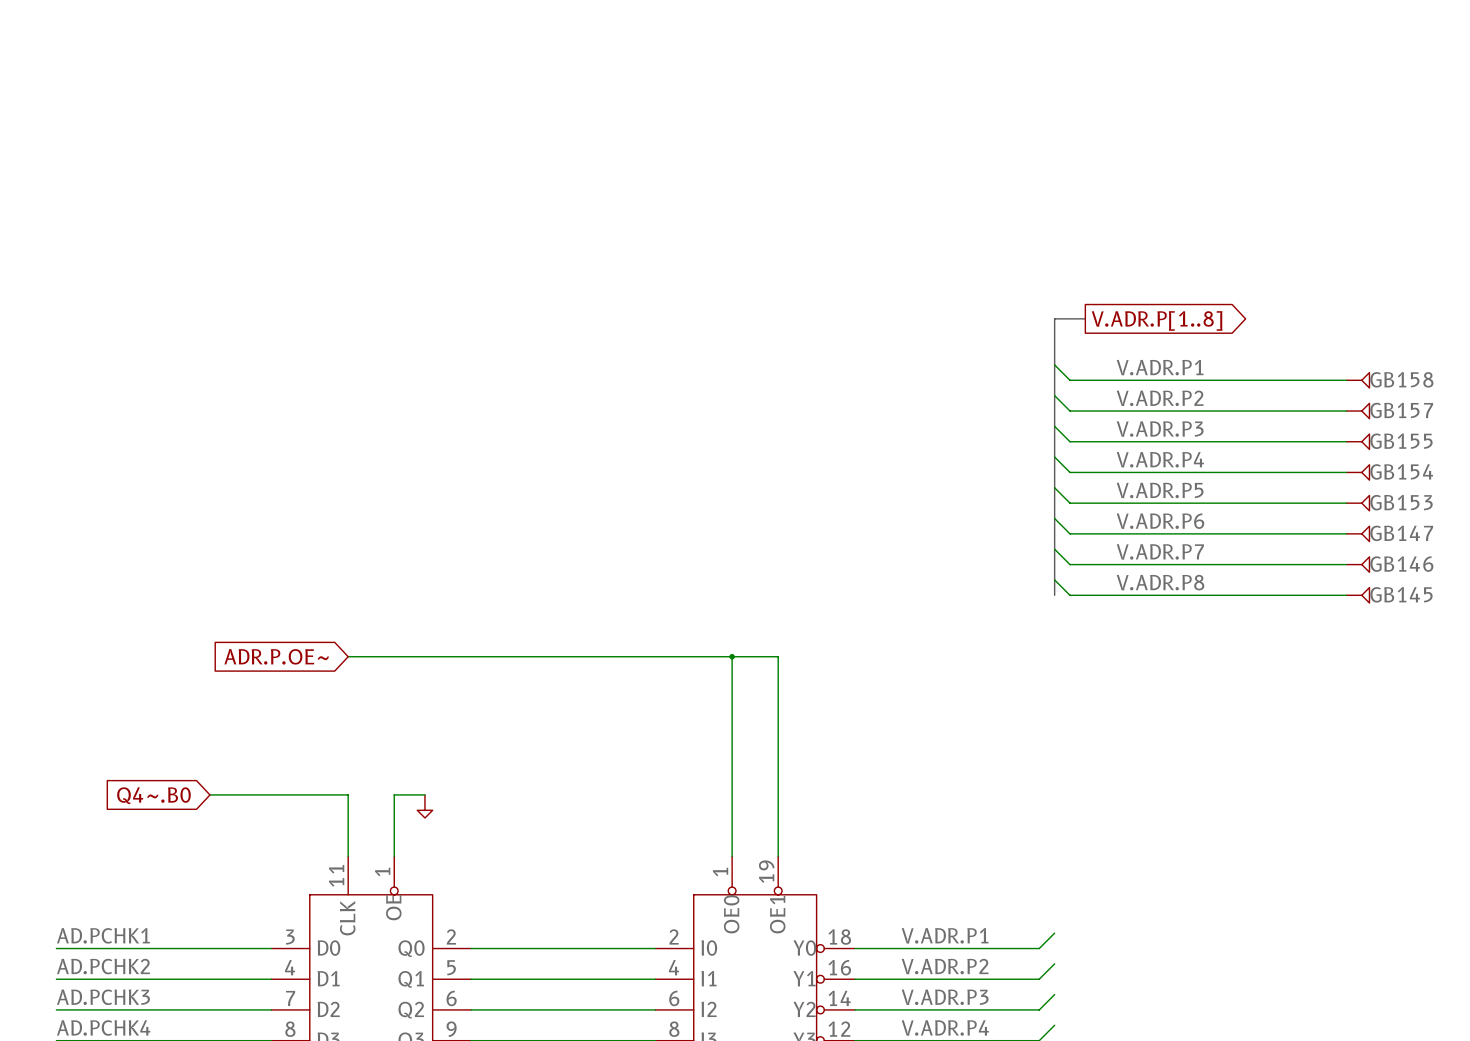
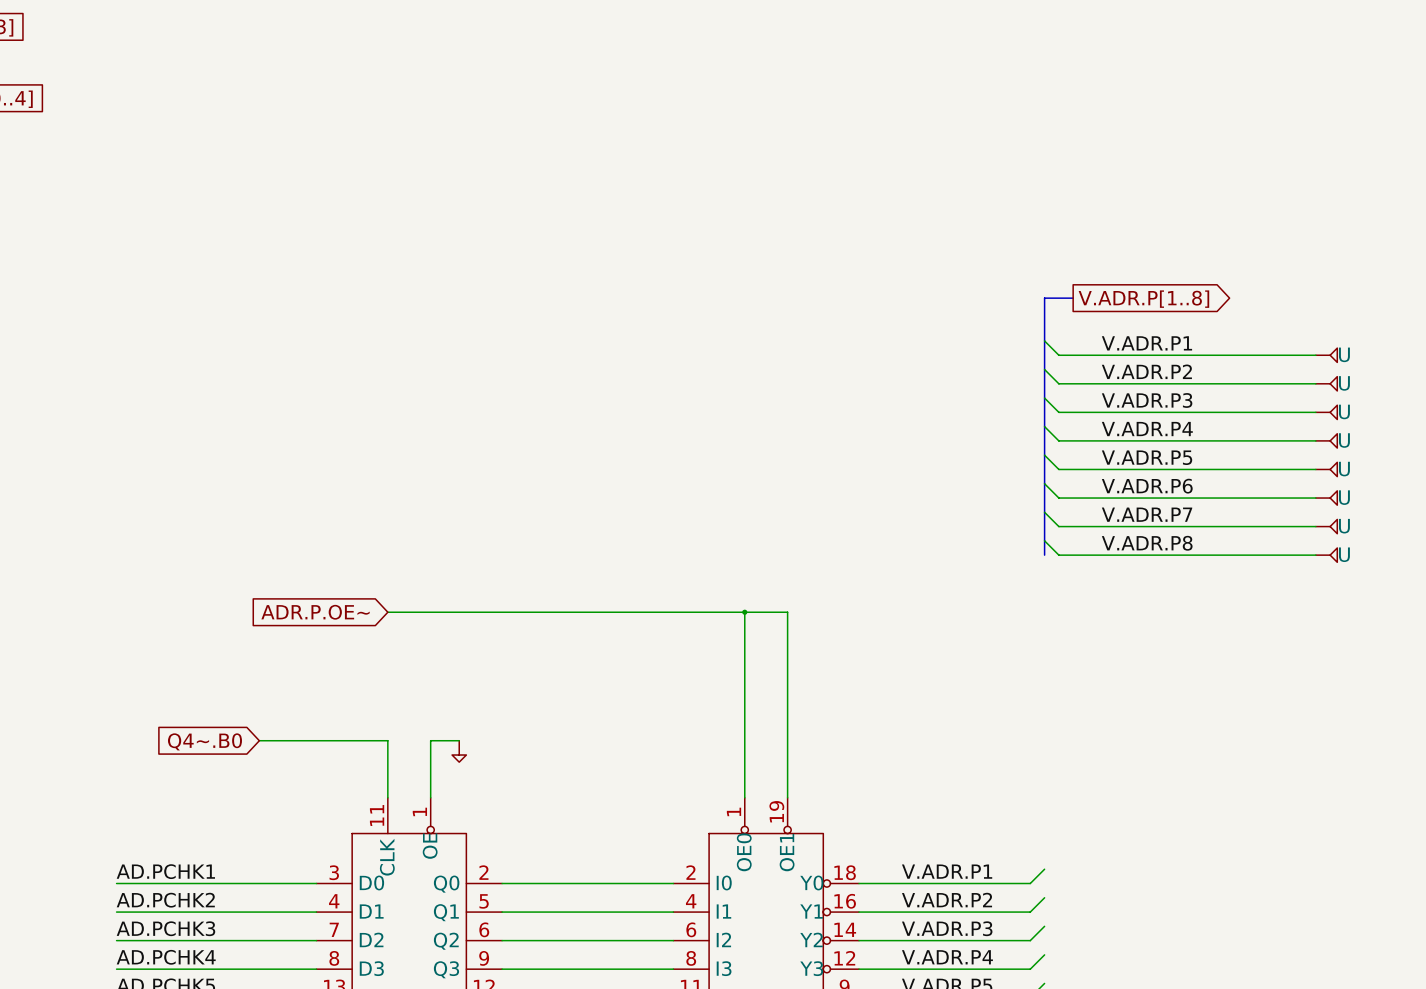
GB158 name: GB158 (1401, 379) -> U (1344, 354)
GB157 name: GB157 (1401, 410) -> U (1344, 383)
GB155 name: GB155 (1401, 441) -> U (1344, 411)
GB154 name: GB154 (1401, 471) -> U (1344, 440)
GB153 name: GB153 (1401, 502) -> U (1344, 469)
GB147 name: GB147 (1401, 533) -> U (1344, 497)
GB146 name: GB146 (1401, 564) -> U (1344, 526)
GB145 name: GB145 (1401, 594) -> U (1344, 554)

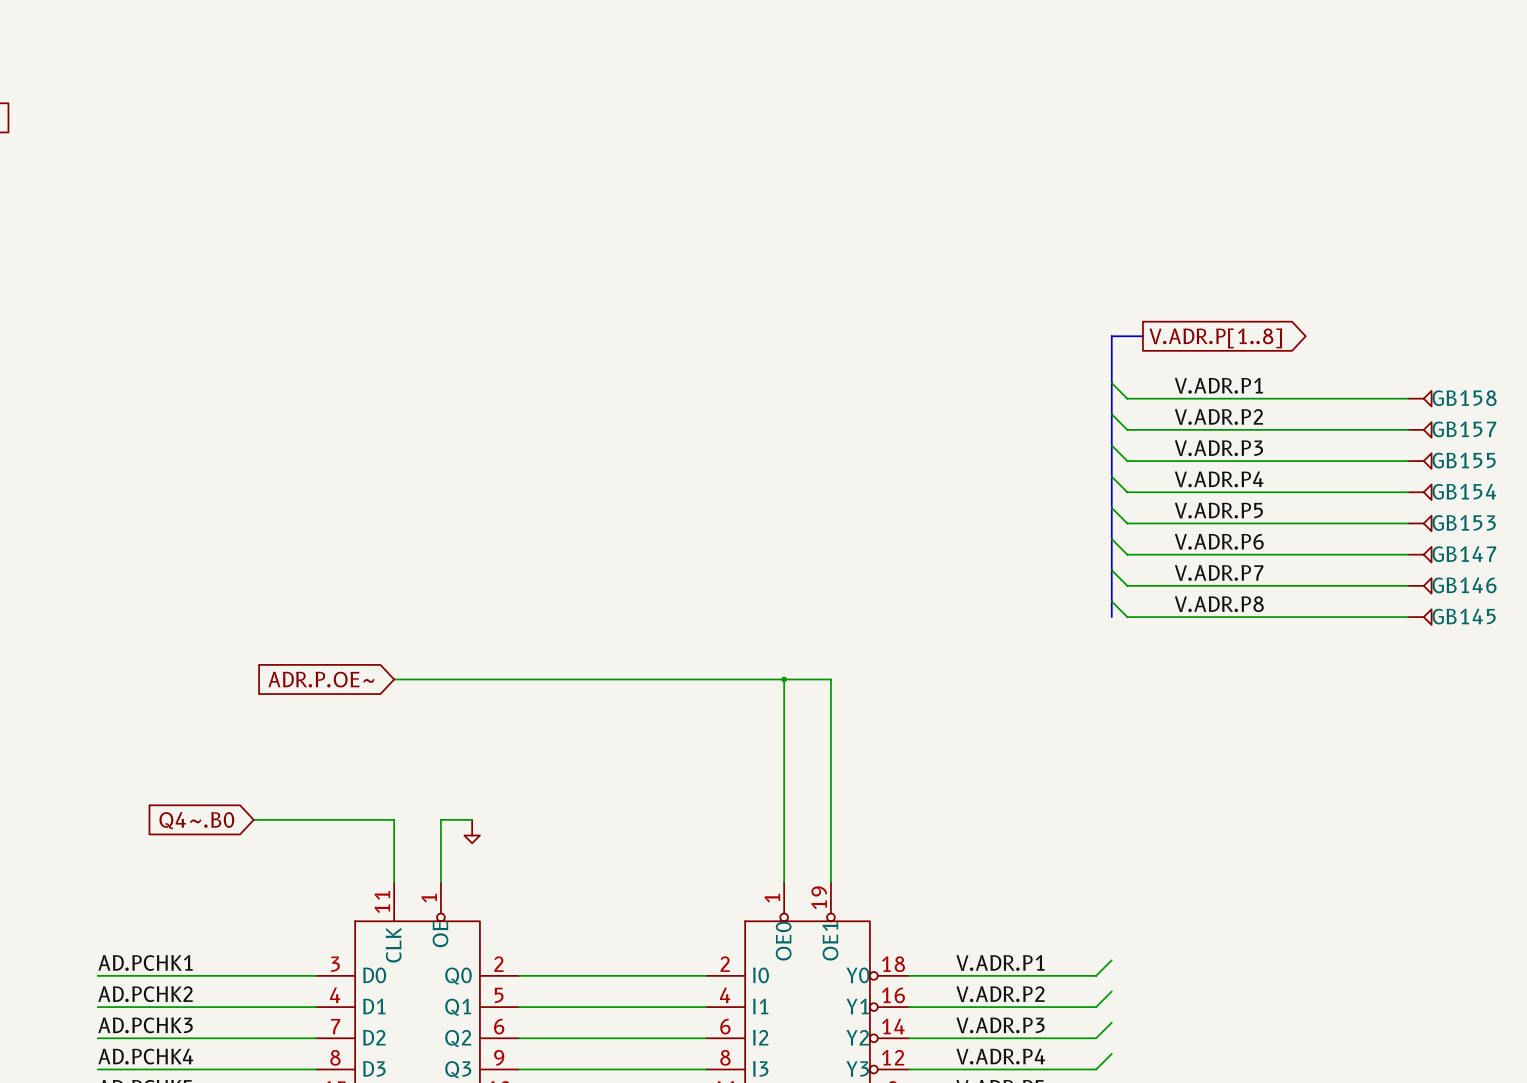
U name: U (1344, 354) -> GB158 (1464, 398)
U name: U (1344, 383) -> GB157 (1464, 429)
U name: U (1344, 411) -> GB155 (1464, 460)
U name: U (1344, 440) -> GB154 (1464, 491)
U name: U (1344, 469) -> GB153 (1464, 522)
U name: U (1344, 497) -> GB147 (1464, 554)
U name: U (1344, 526) -> GB146 (1464, 585)
U name: U (1344, 554) -> GB145 (1464, 616)

